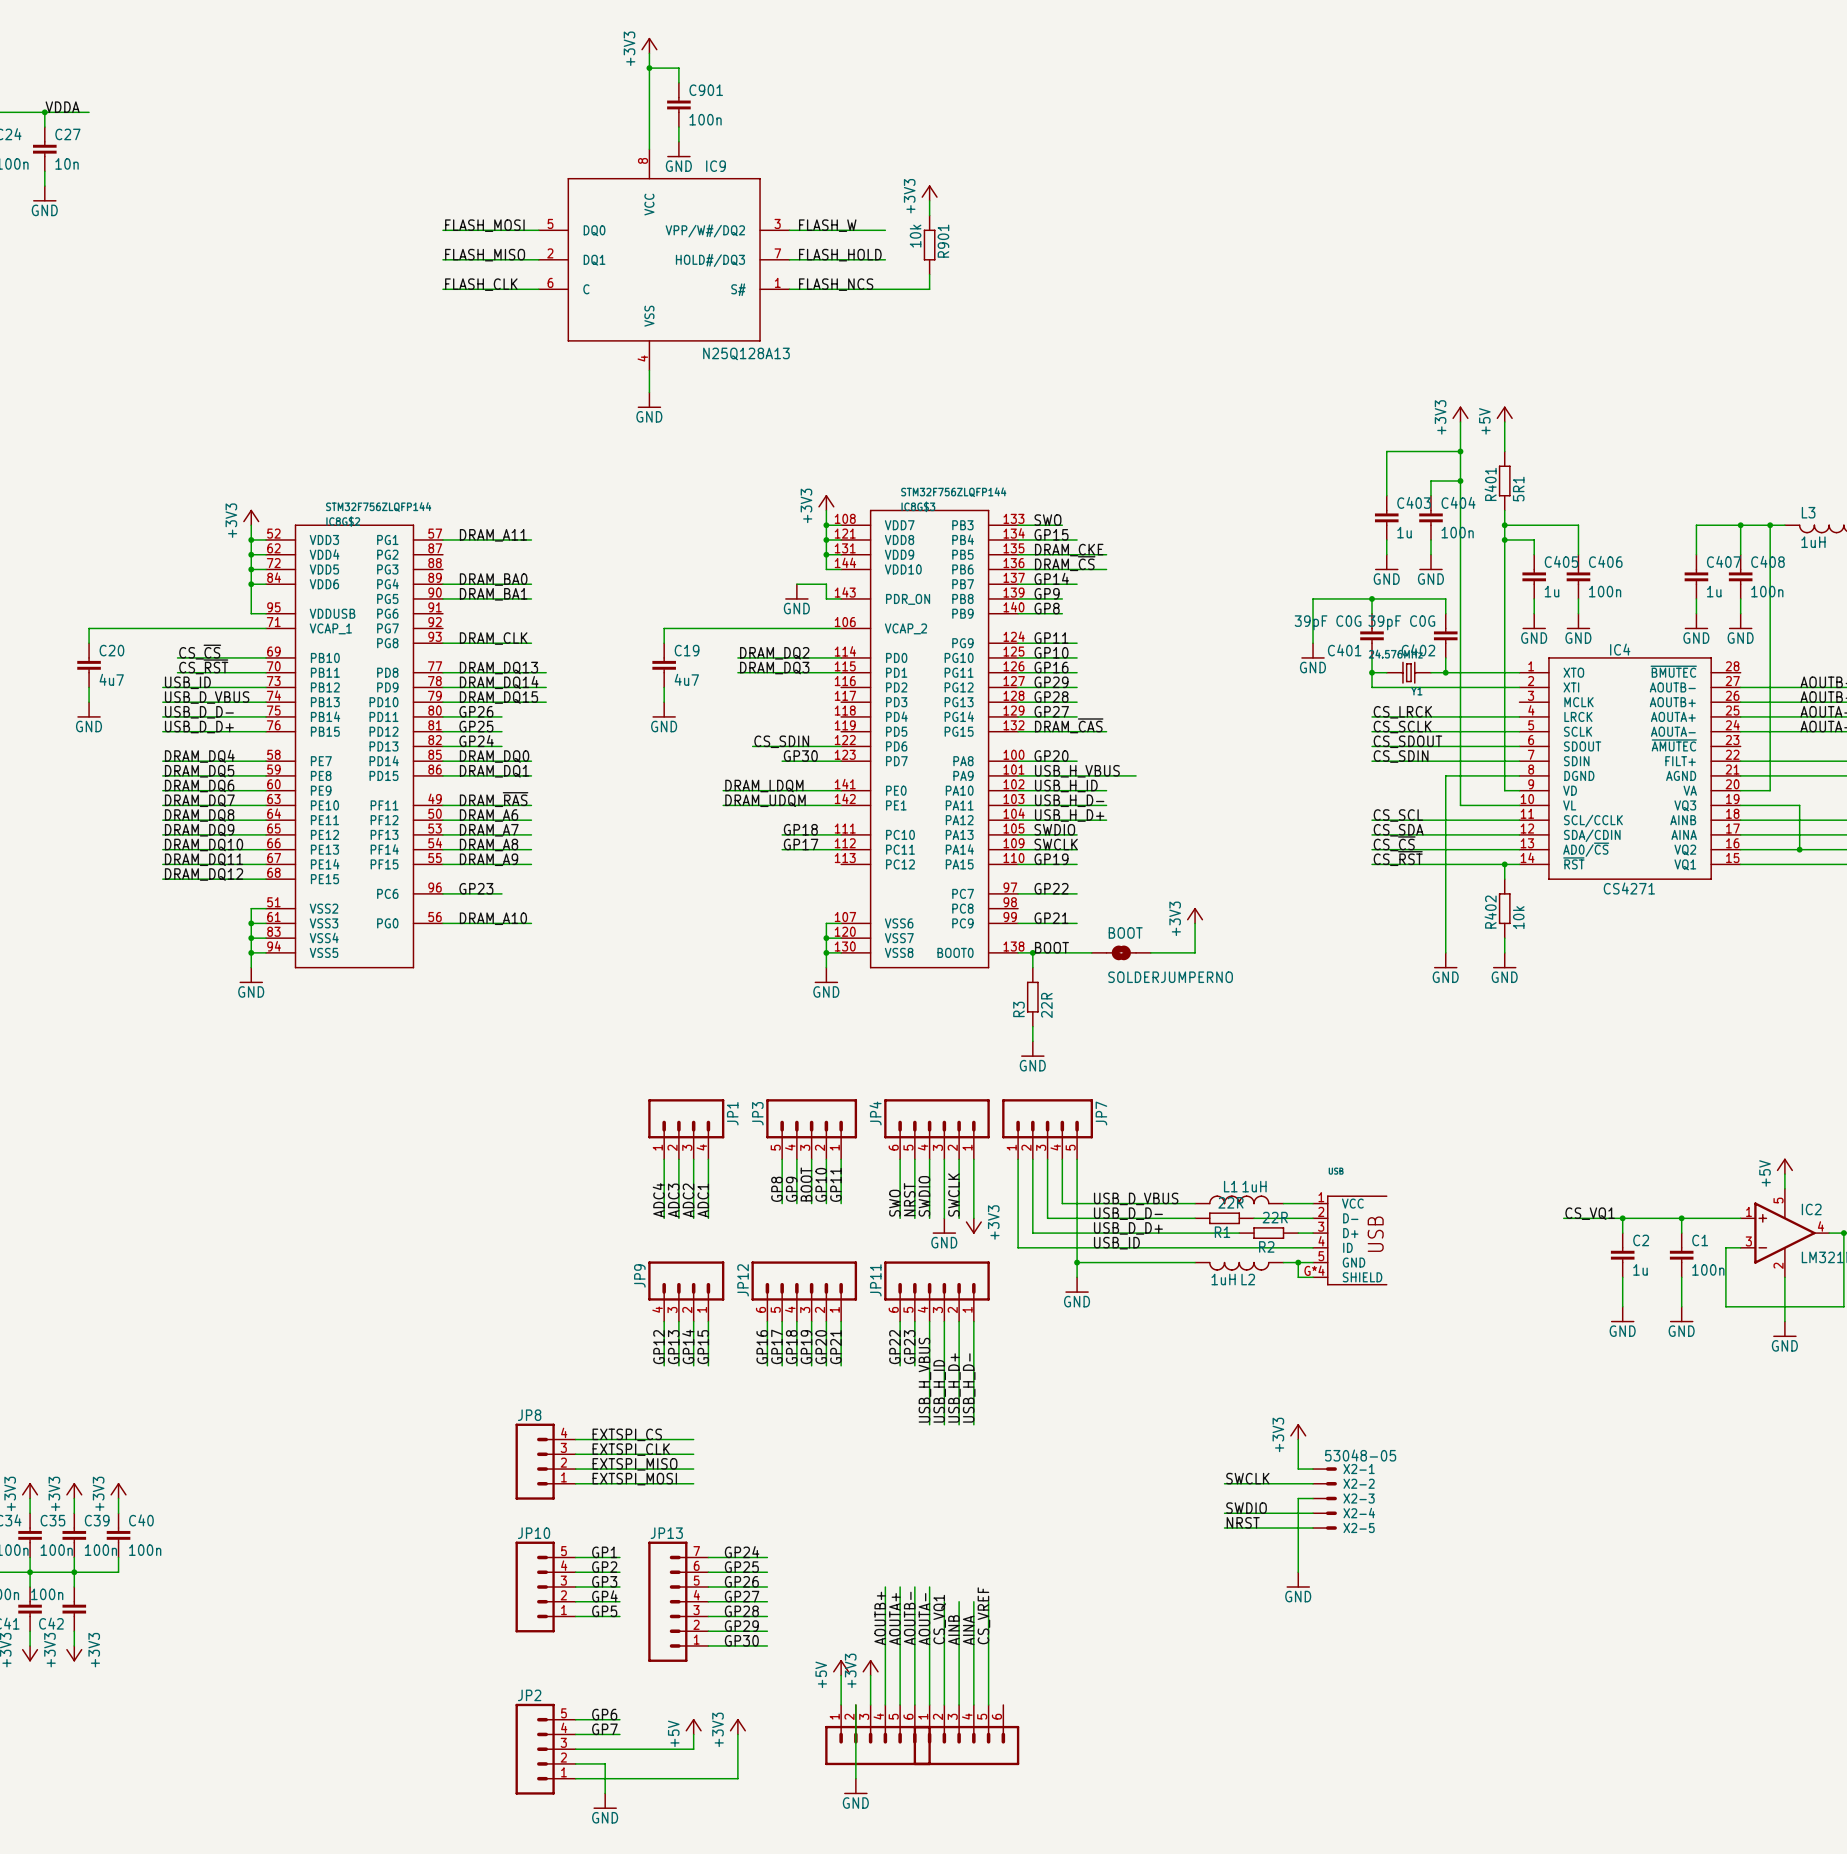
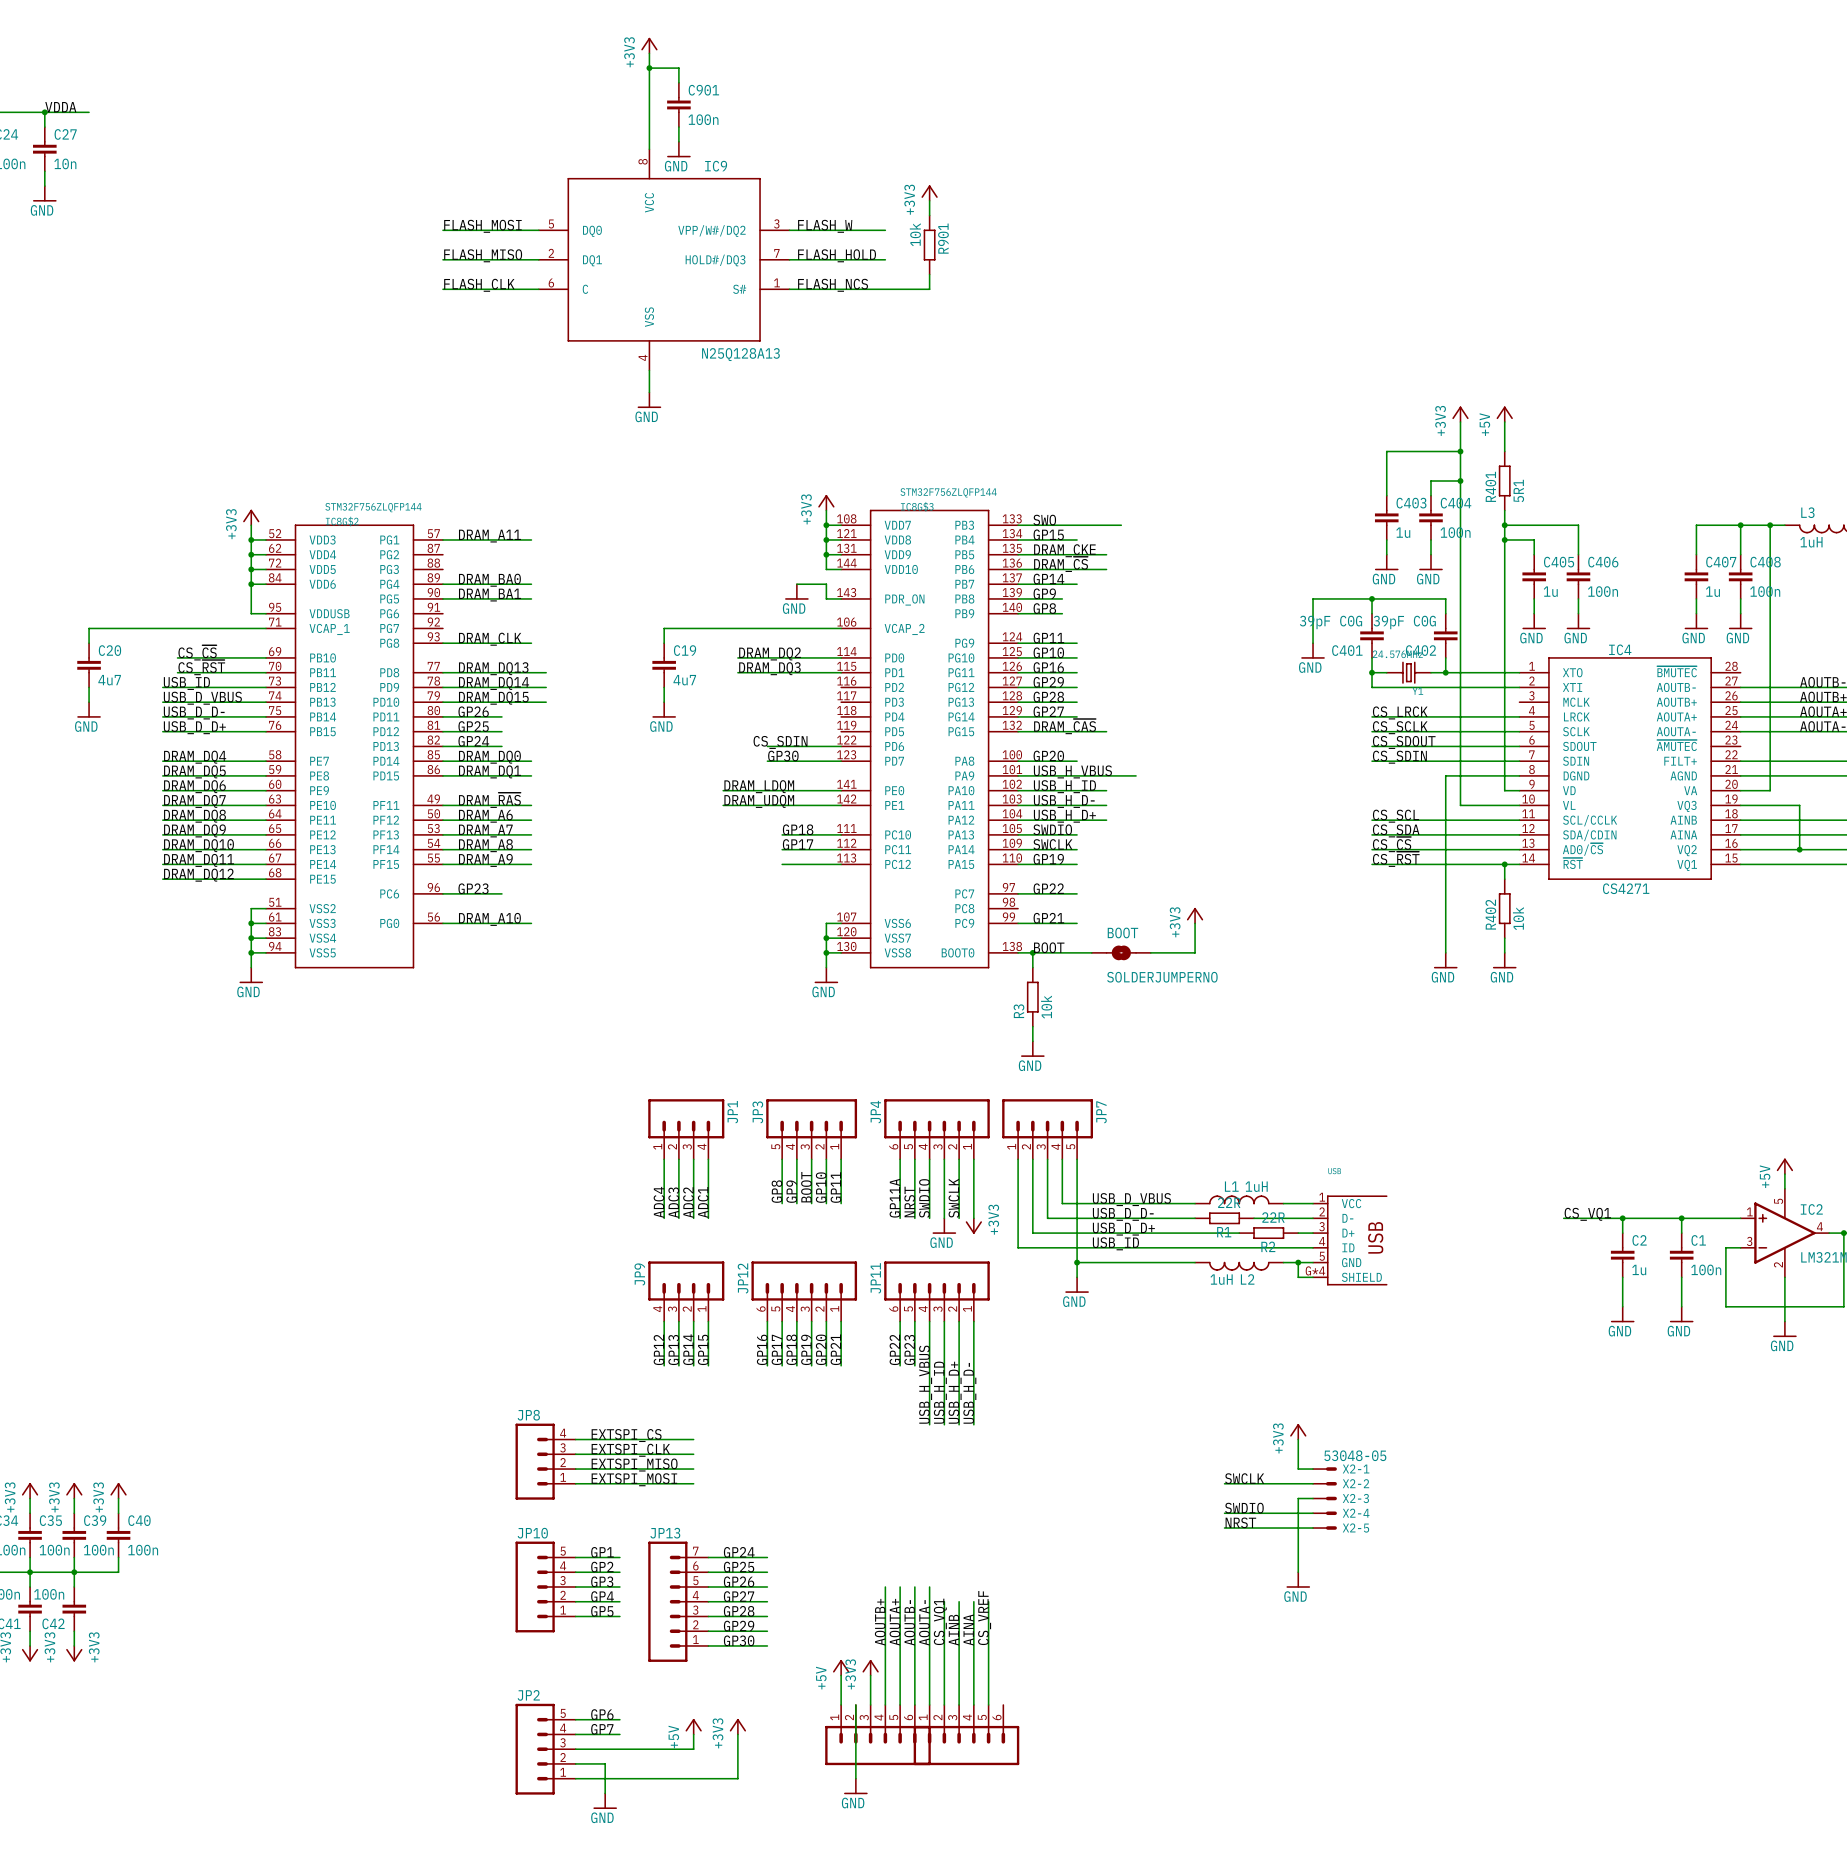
wire: none -> (1062, 525) (1121, 525)
wire: (752, 746) (767, 746) -> (767, 761) (782, 761)
label position: GP30 (800, 756) -> GP30 (783, 756)
wire: none -> (782, 864) (841, 864)
R3 value: 22R (1046, 1005) -> 10k (1046, 1007)
label: SWO (894, 1203) -> GP11A (894, 1198)

